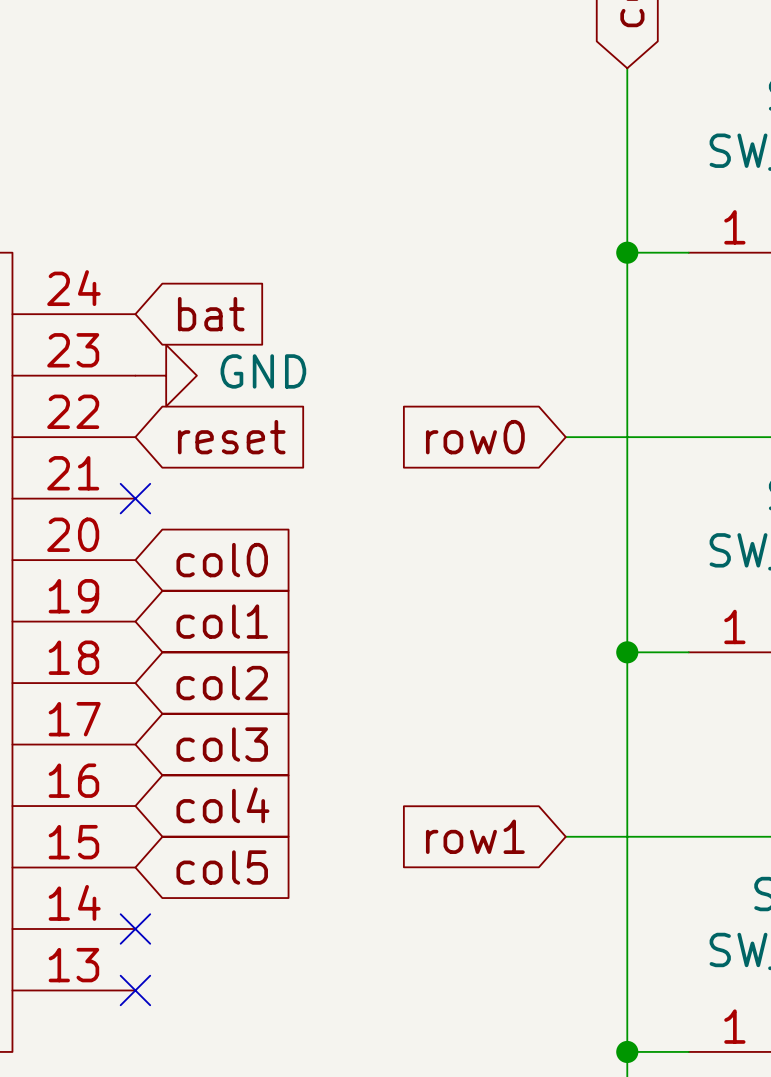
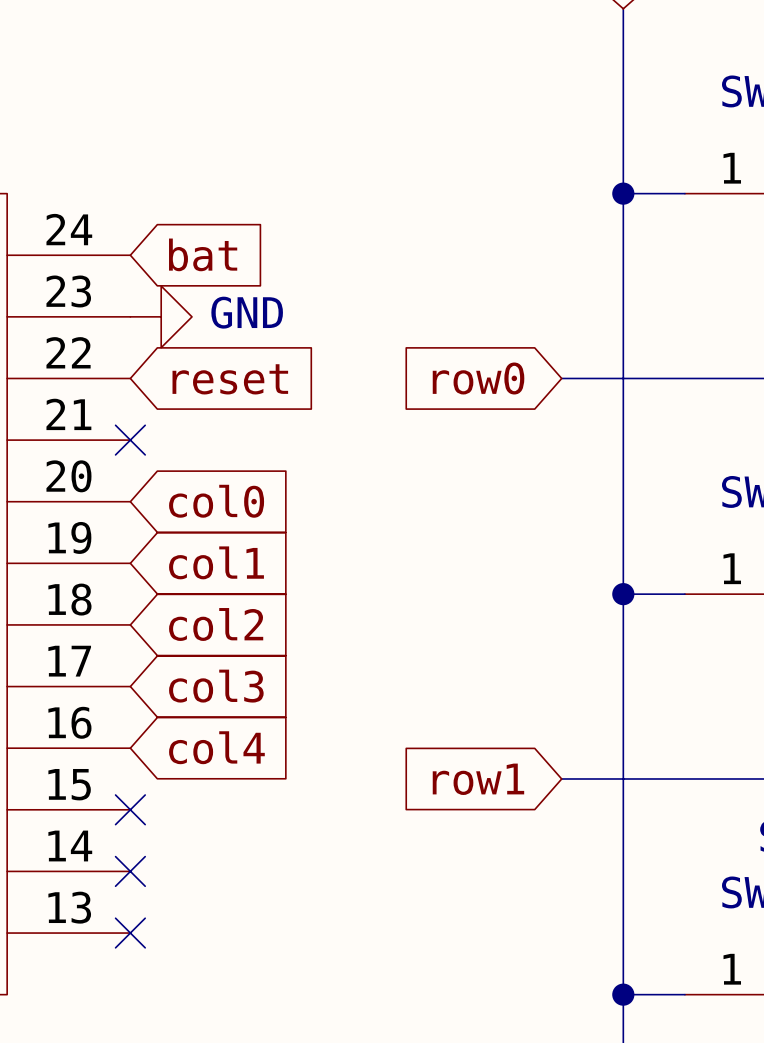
no-connect mark: none -> (130, 809)
global label: col5 (222, 867) -> none

